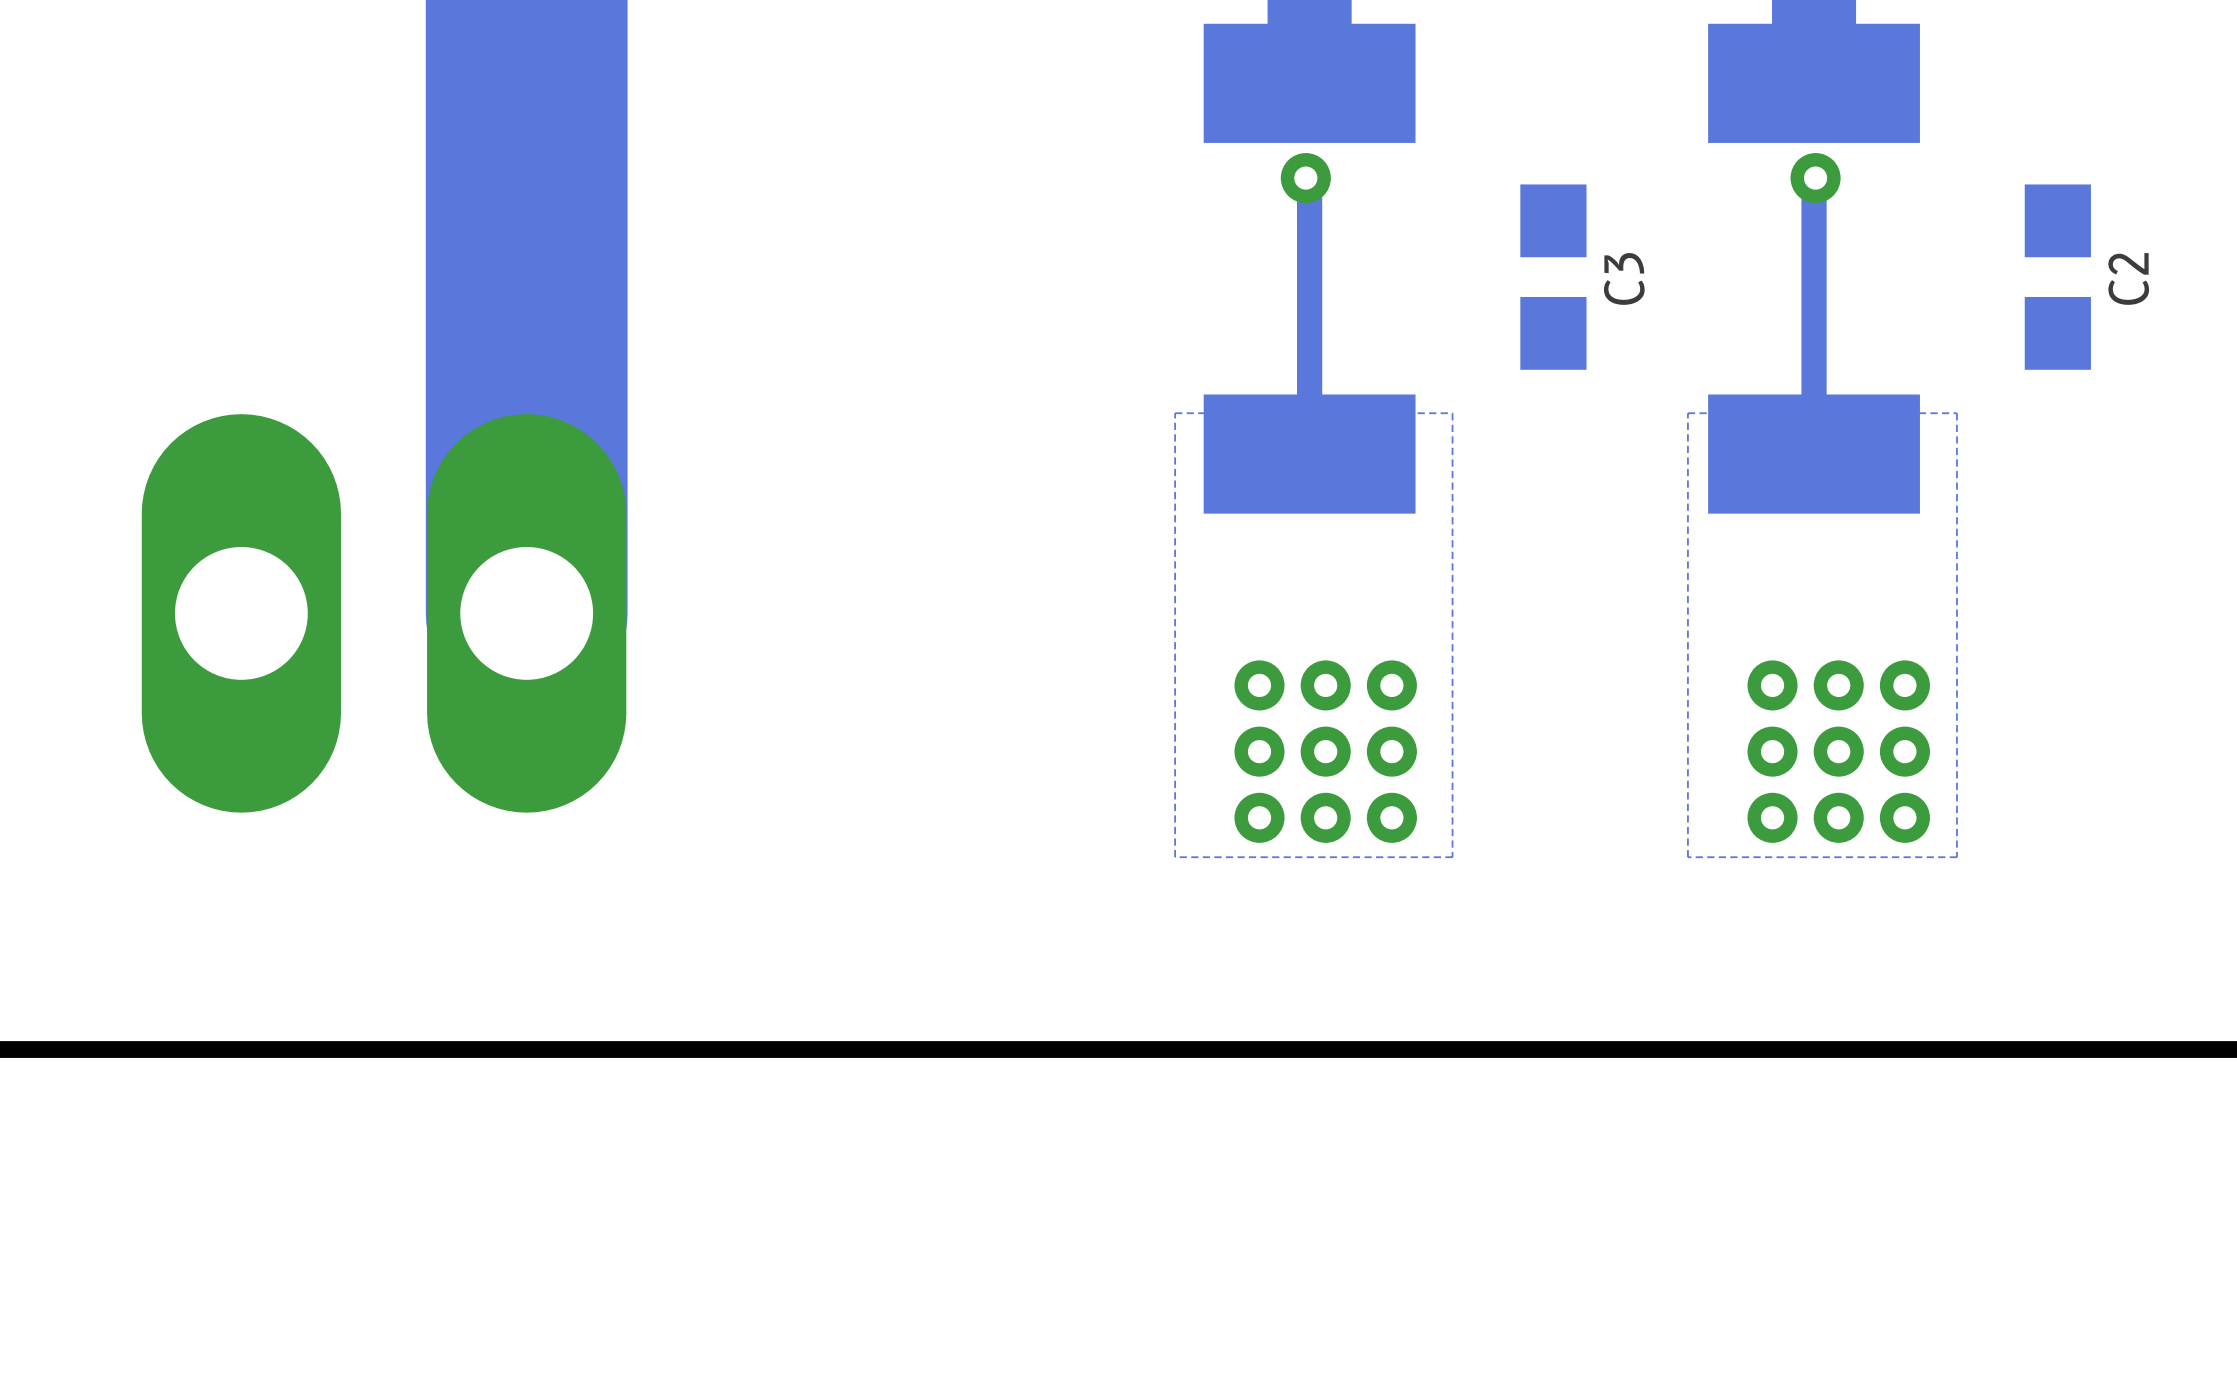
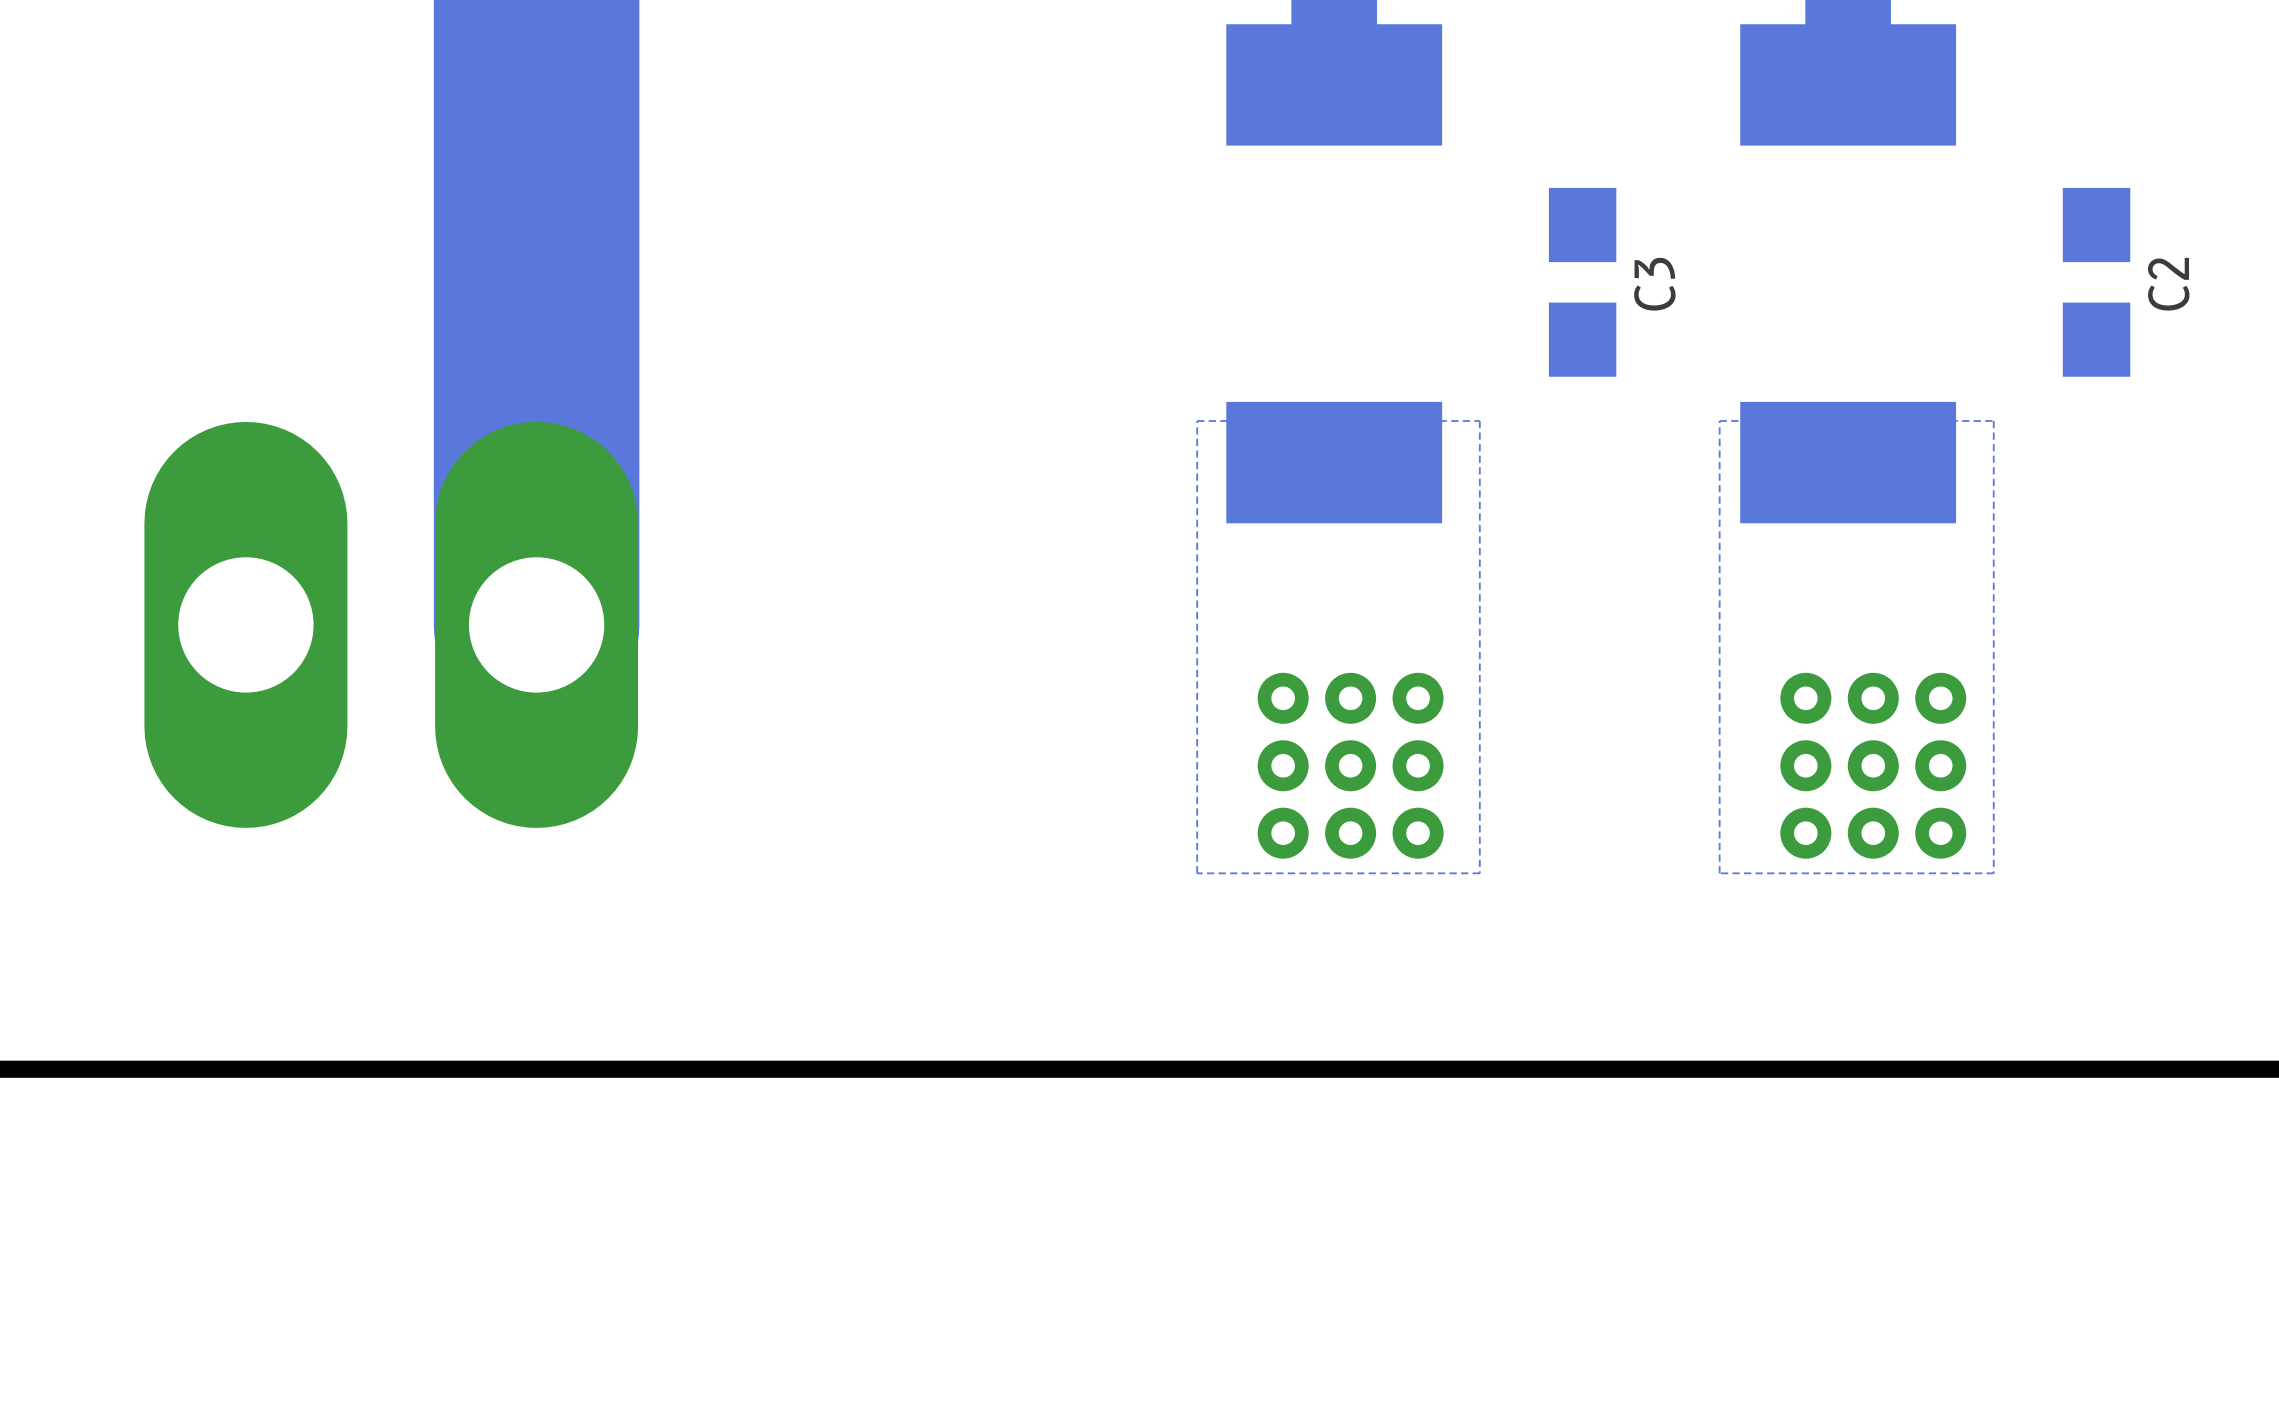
track: (1305, 178) (1309, 181) (1309, 454) -> none
via: (1305, 178) -> none
track: (1815, 178) (1814, 179) (1814, 454) -> none
via: (1815, 178) -> none

